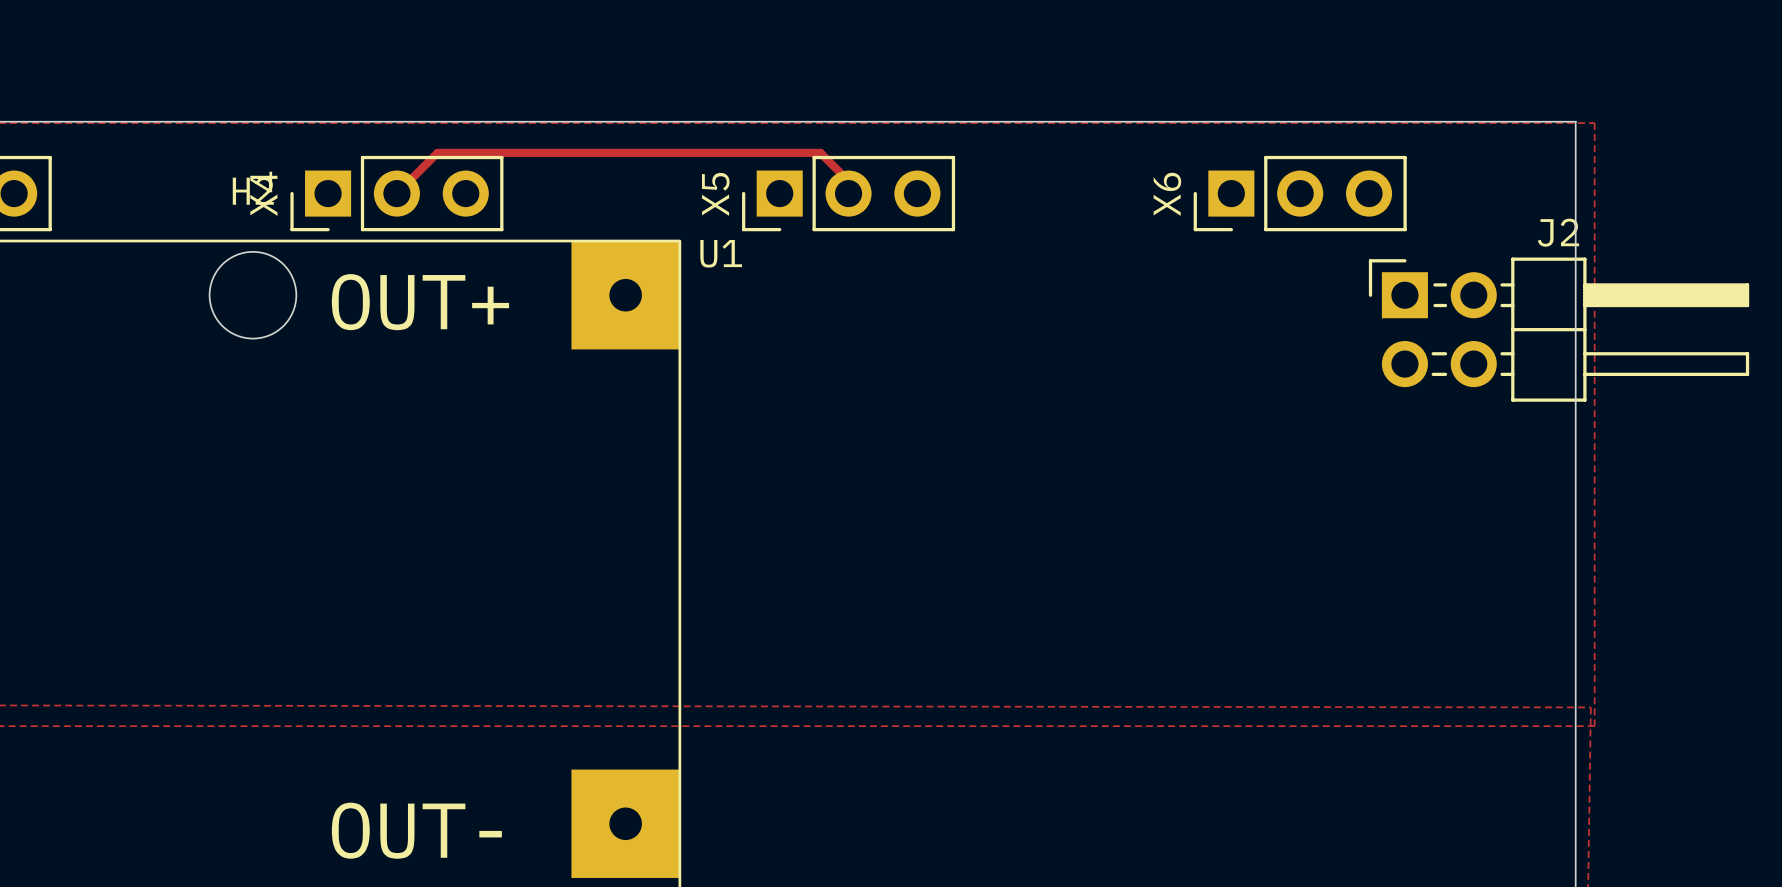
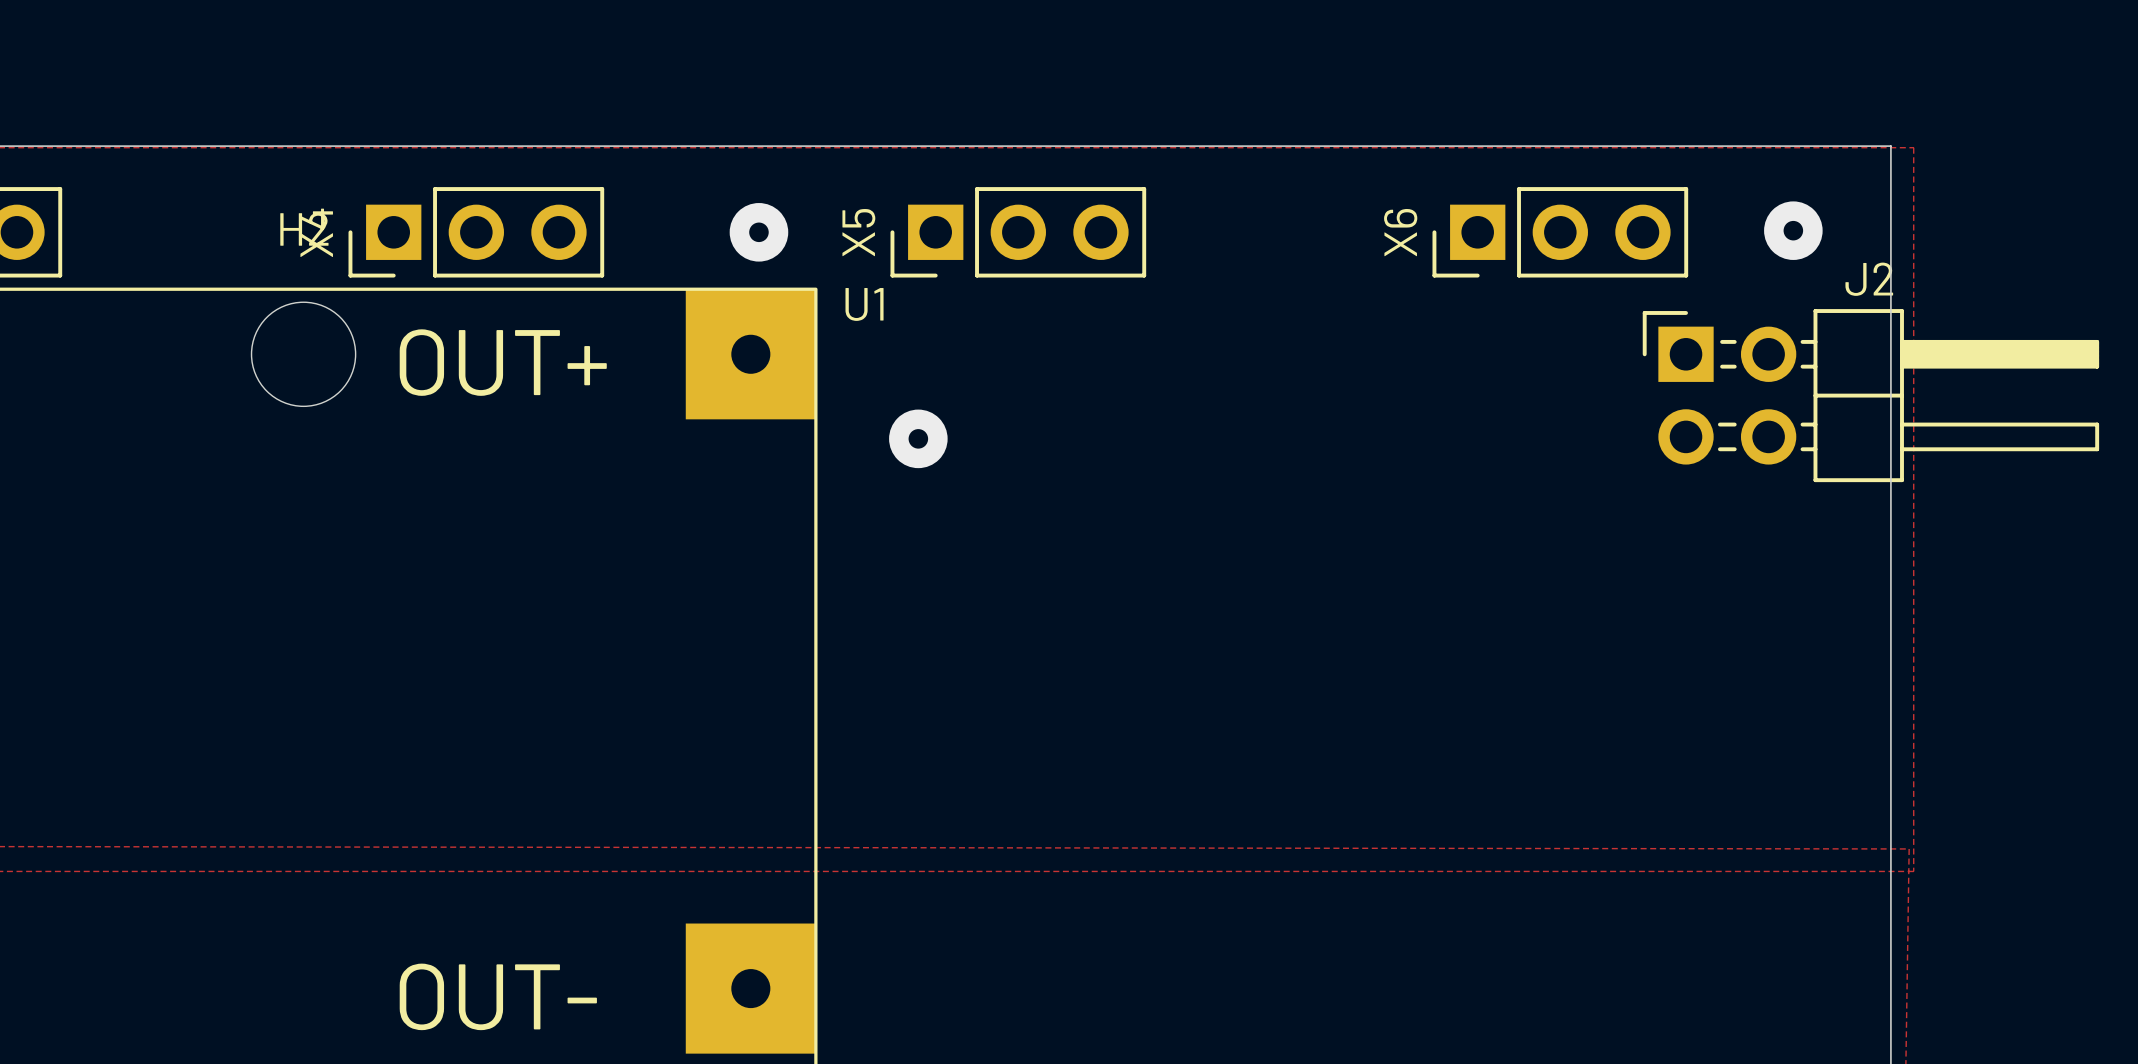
via: none -> (1793, 230)
track: (396, 193) (437, 152) (820, 152) (848, 181) (848, 193) -> none
via: none -> (758, 232)
via: none -> (918, 438)

